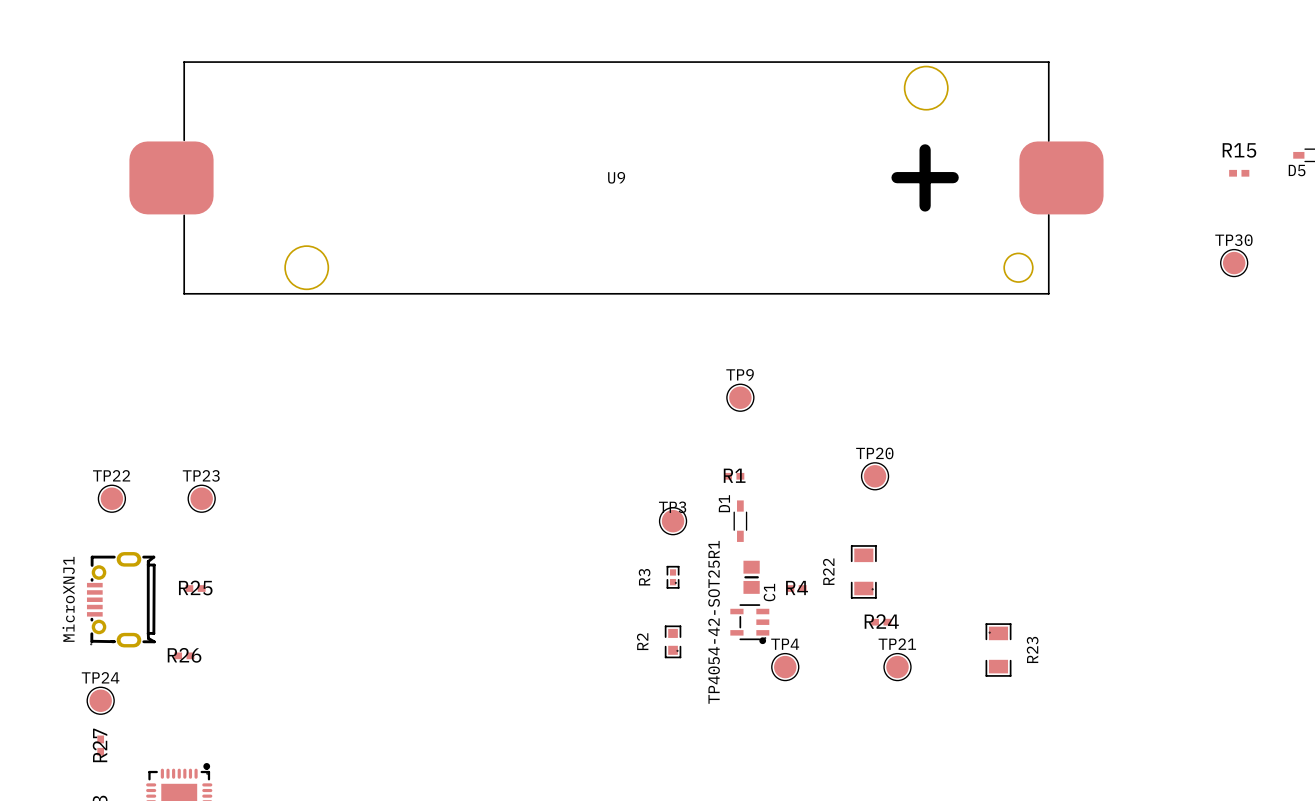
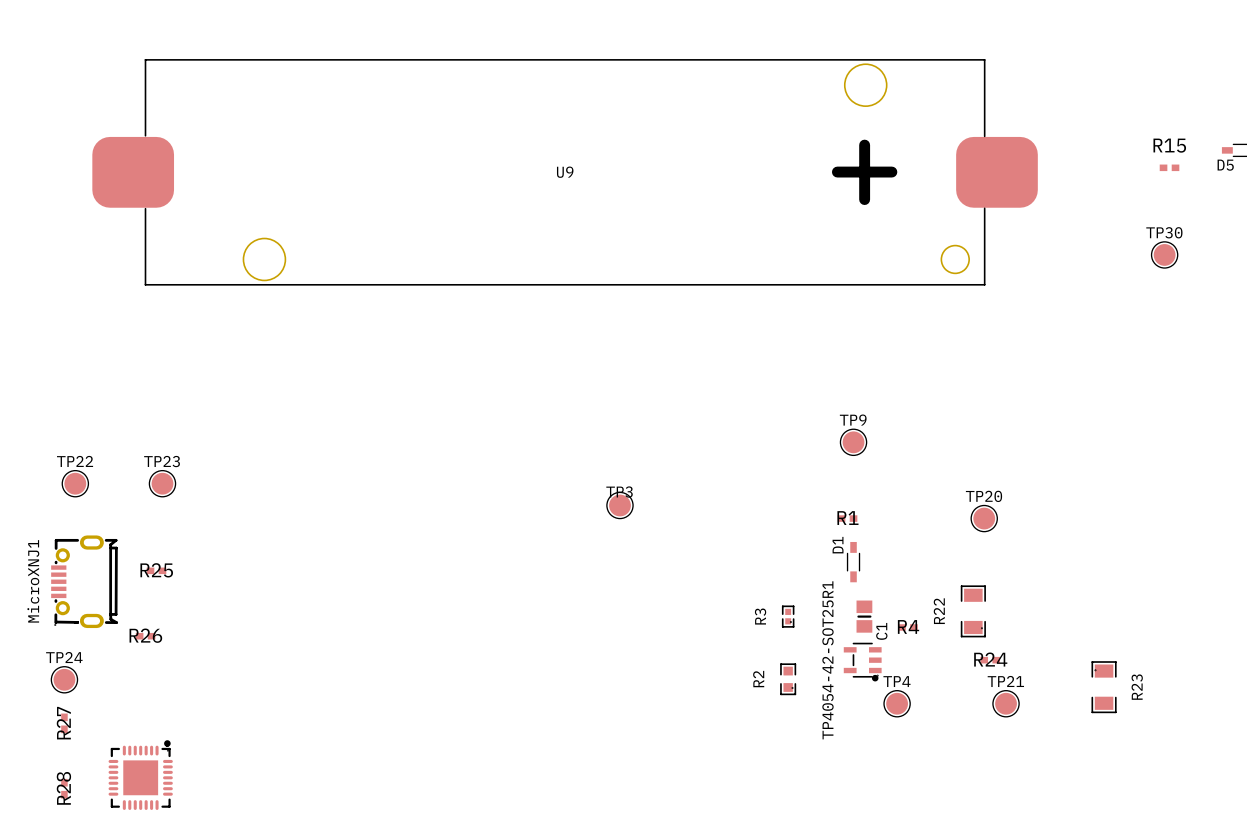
TP9 position: (740, 397) -> (853, 442)
R1 position: (734, 476) -> (847, 518)
TP20 position: (875, 476) -> (984, 518)
D1 position: (740, 521) -> (853, 562)
R22 position: (863, 571) -> (973, 611)
R3 position: (673, 577) -> (788, 616)
C1 position: (751, 577) -> (864, 616)
R4 position: (796, 588) -> (907, 627)
R24 position: (881, 622) -> (990, 660)
TP4054-42-SOT25R1 position: (749, 624) -> (862, 662)
R2 position: (673, 641) -> (788, 679)
R23 position: (998, 650) -> (1104, 687)
TP4 position: (785, 667) -> (897, 703)
TP21 position: (897, 667) -> (1006, 703)

